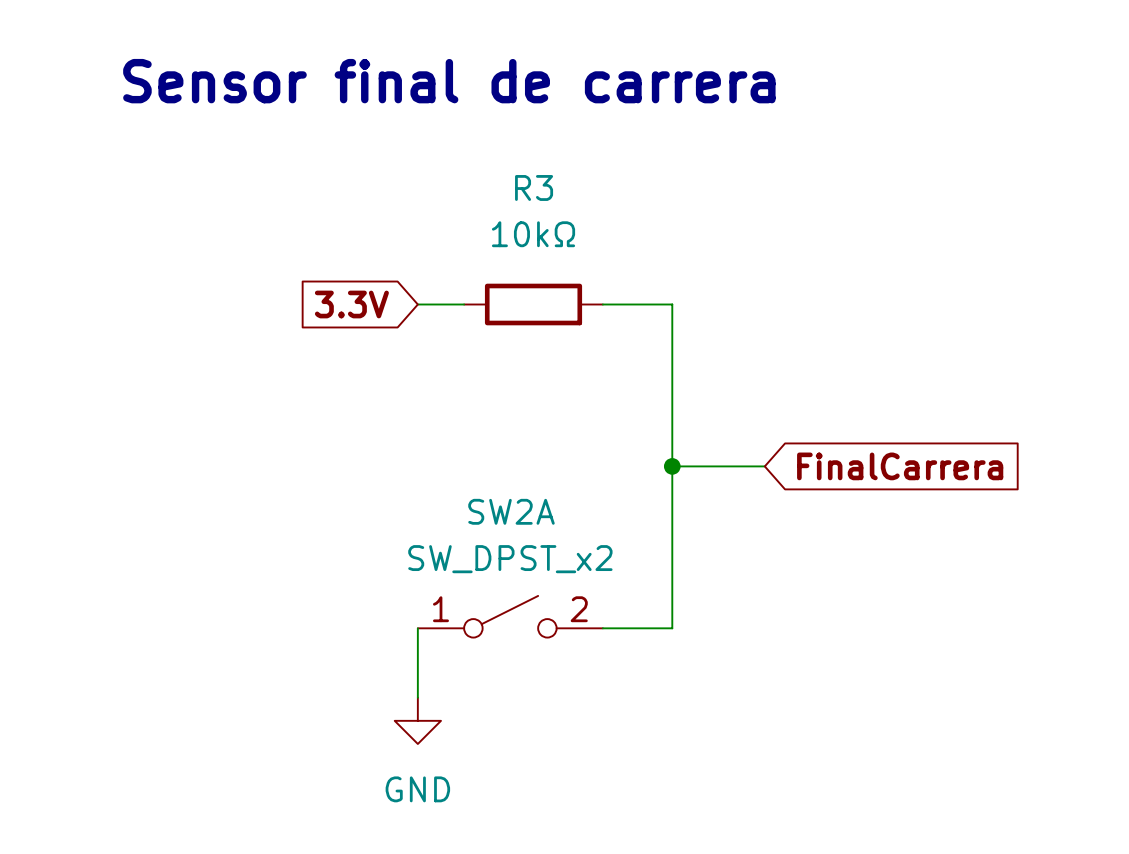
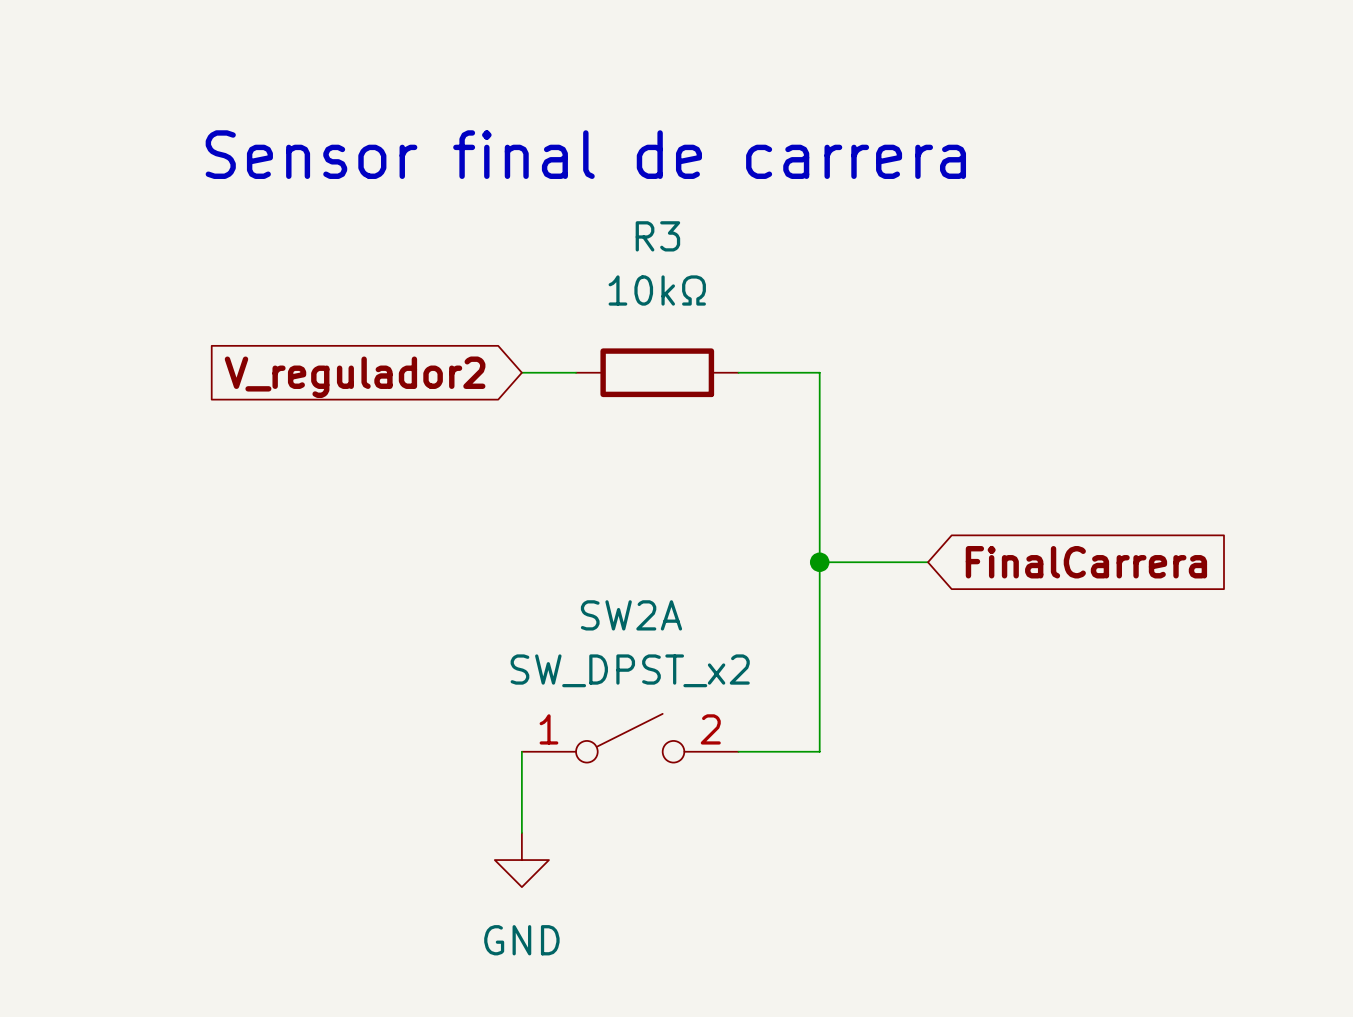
text position: Sensor final de carrera (449, 81) -> Sensor final de carrera (585, 154)
global label: 3.3V (351, 304) -> V_regulador2 (355, 377)

